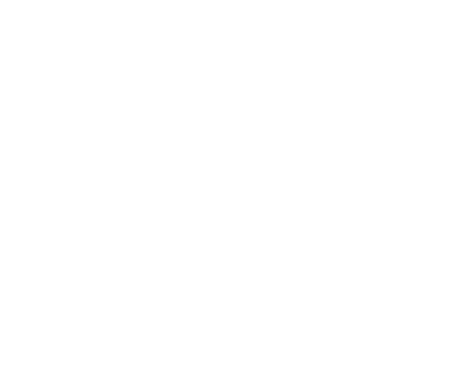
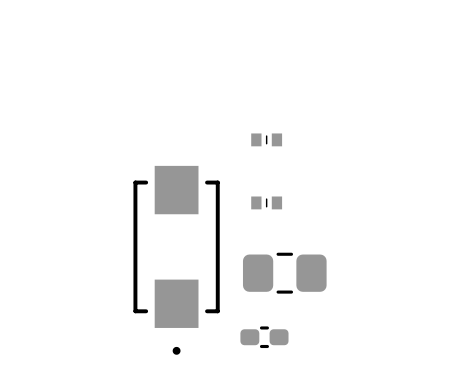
part: none -> (266, 139)
part: none -> (266, 202)
part: none -> (176, 260)
part: none -> (284, 273)
part: none -> (264, 337)

